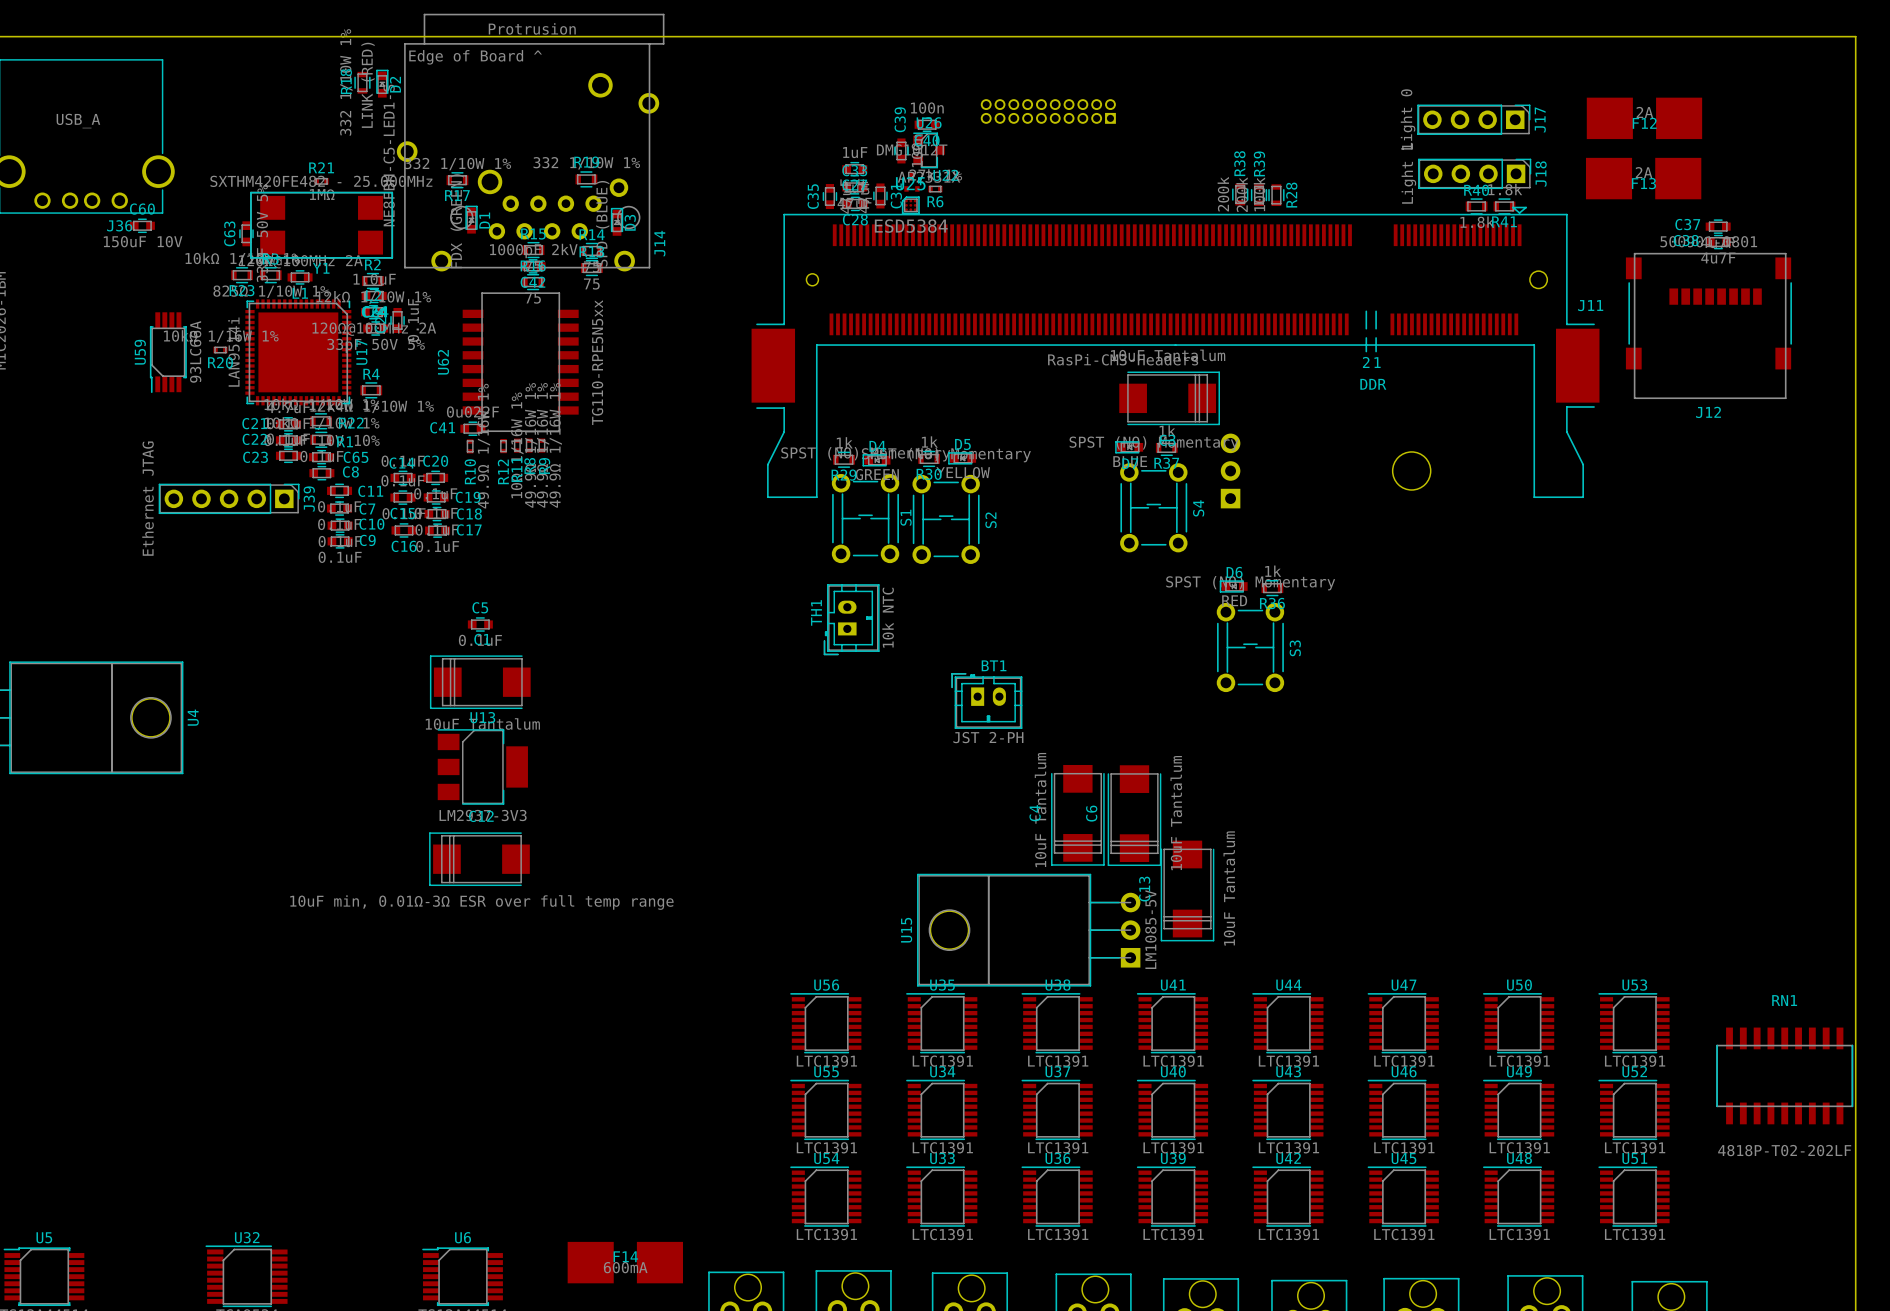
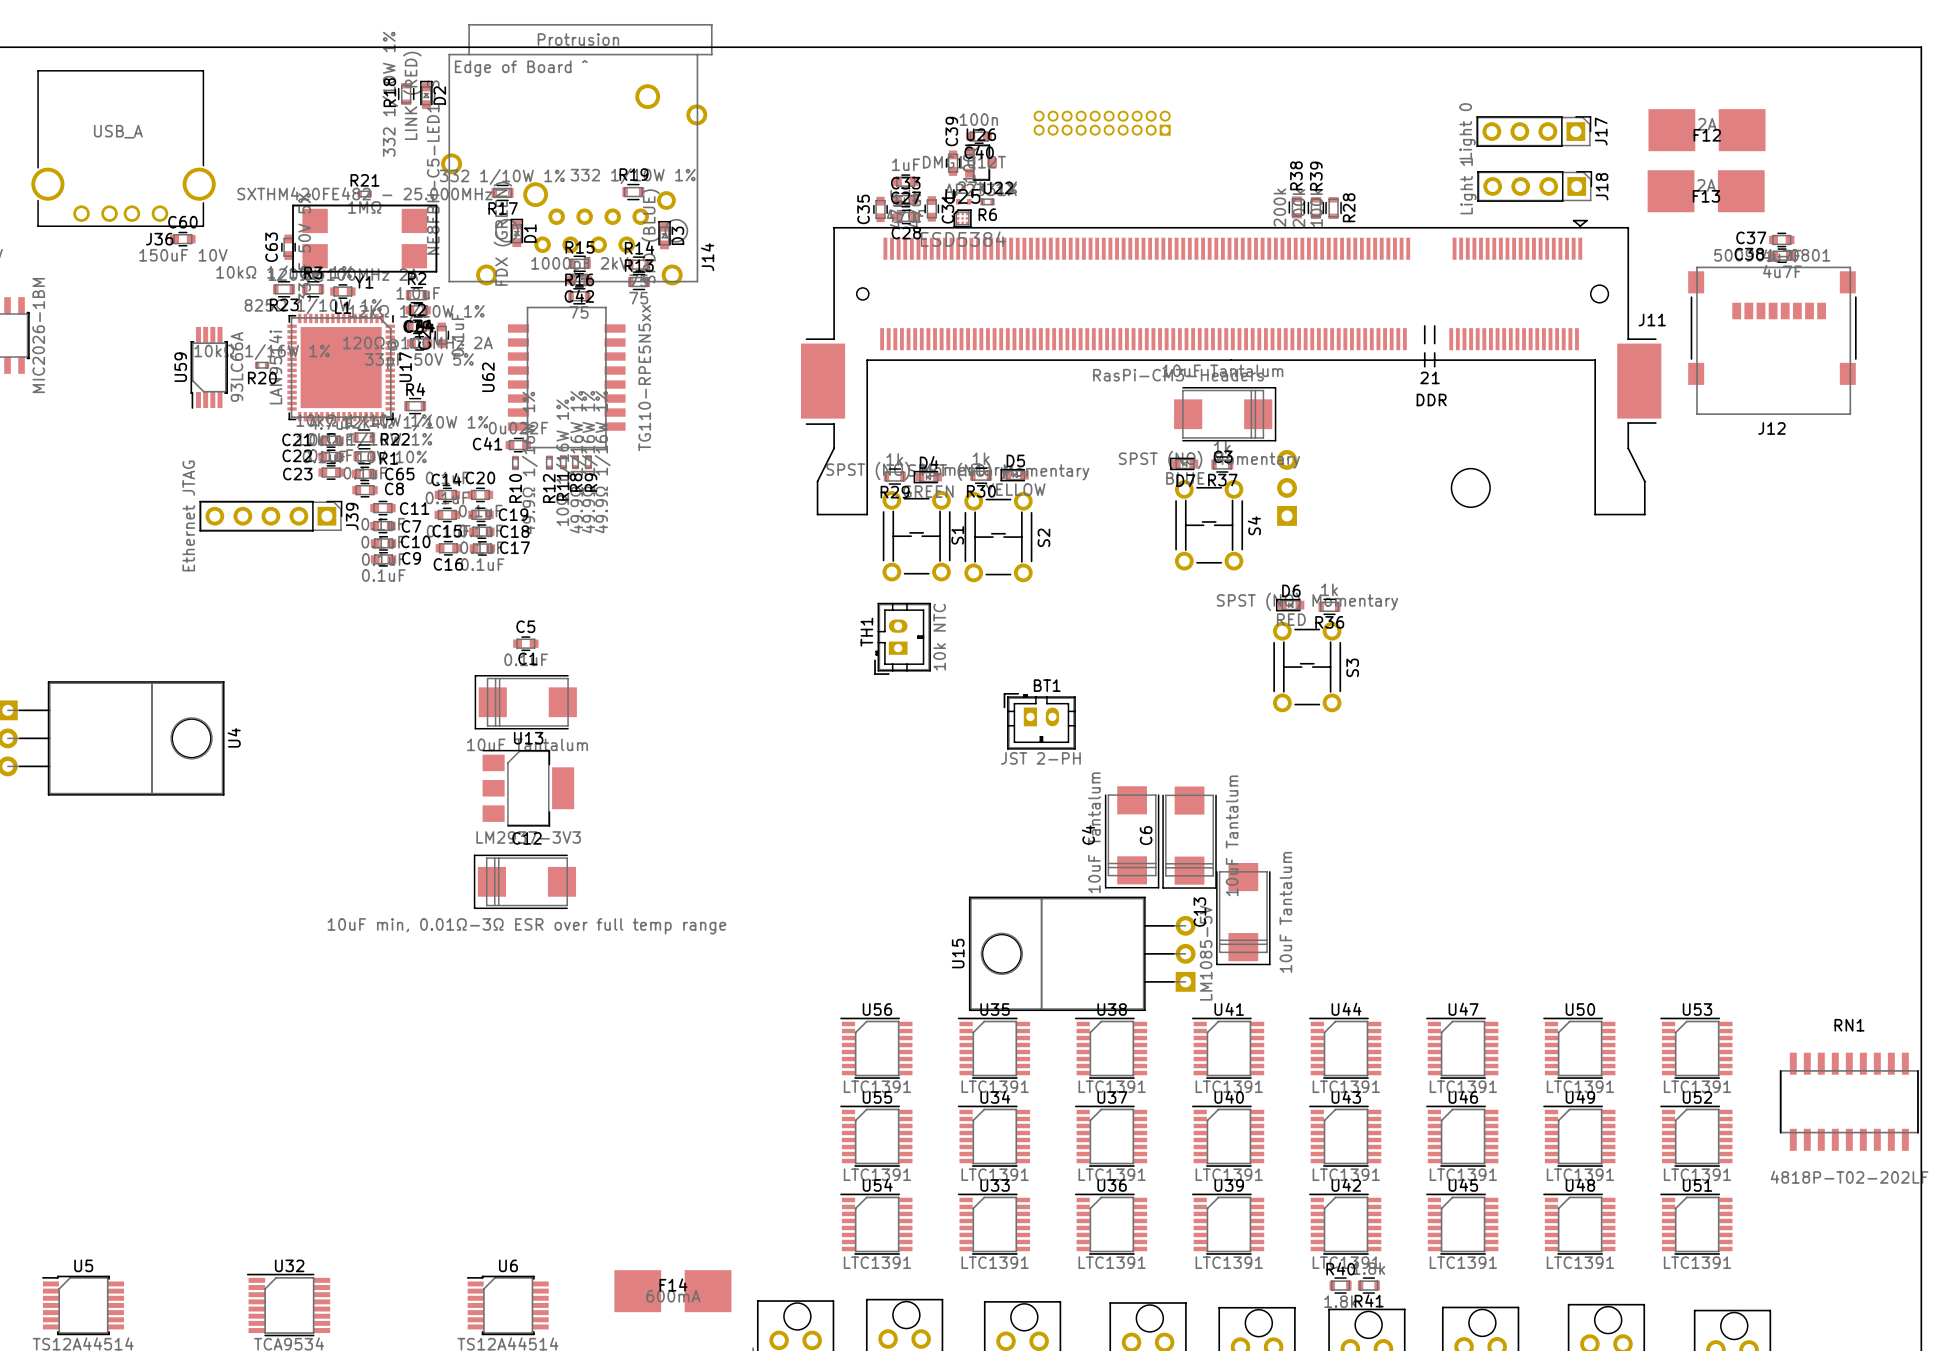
R40 position: (1476, 206) -> (1340, 1285)
R41 position: (1504, 206) -> (1368, 1285)

